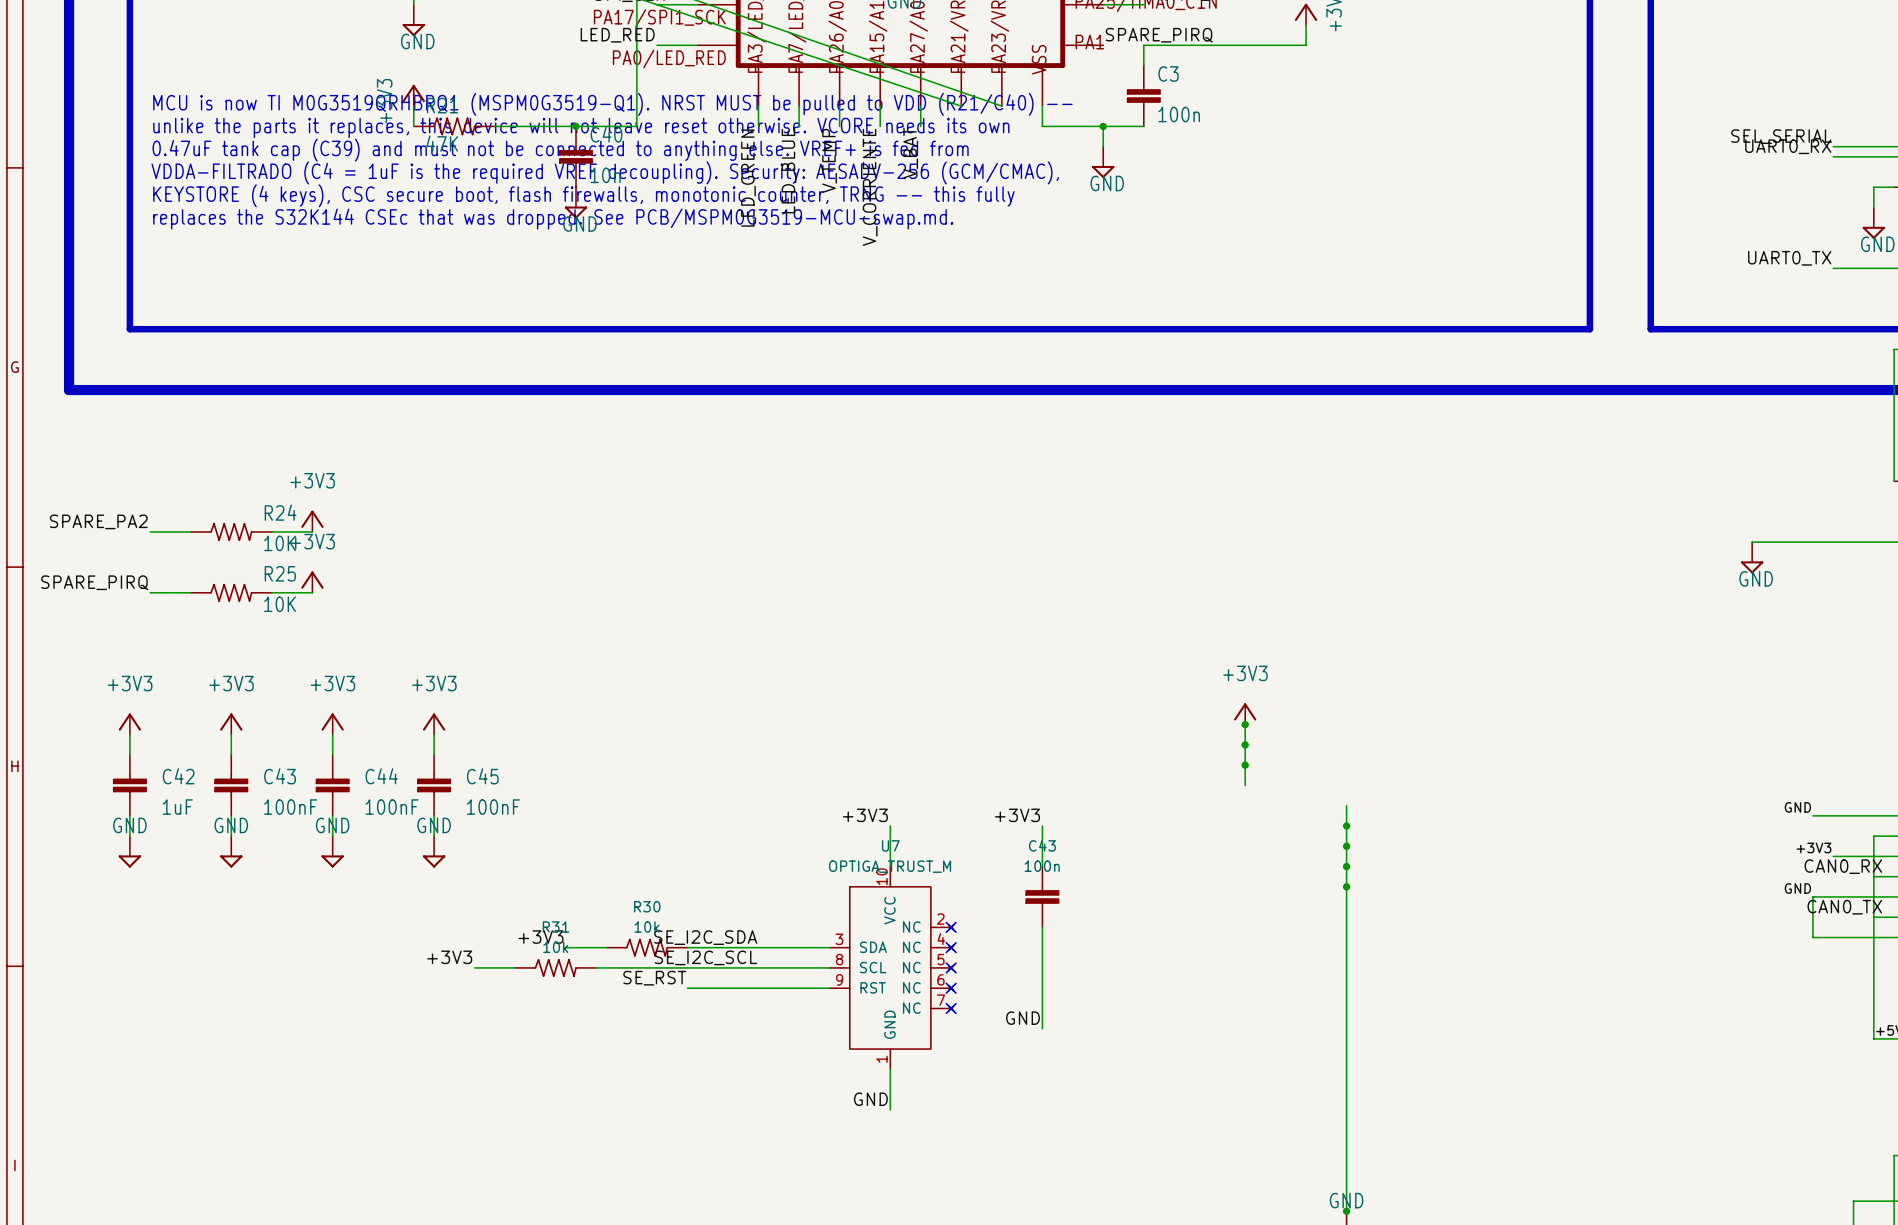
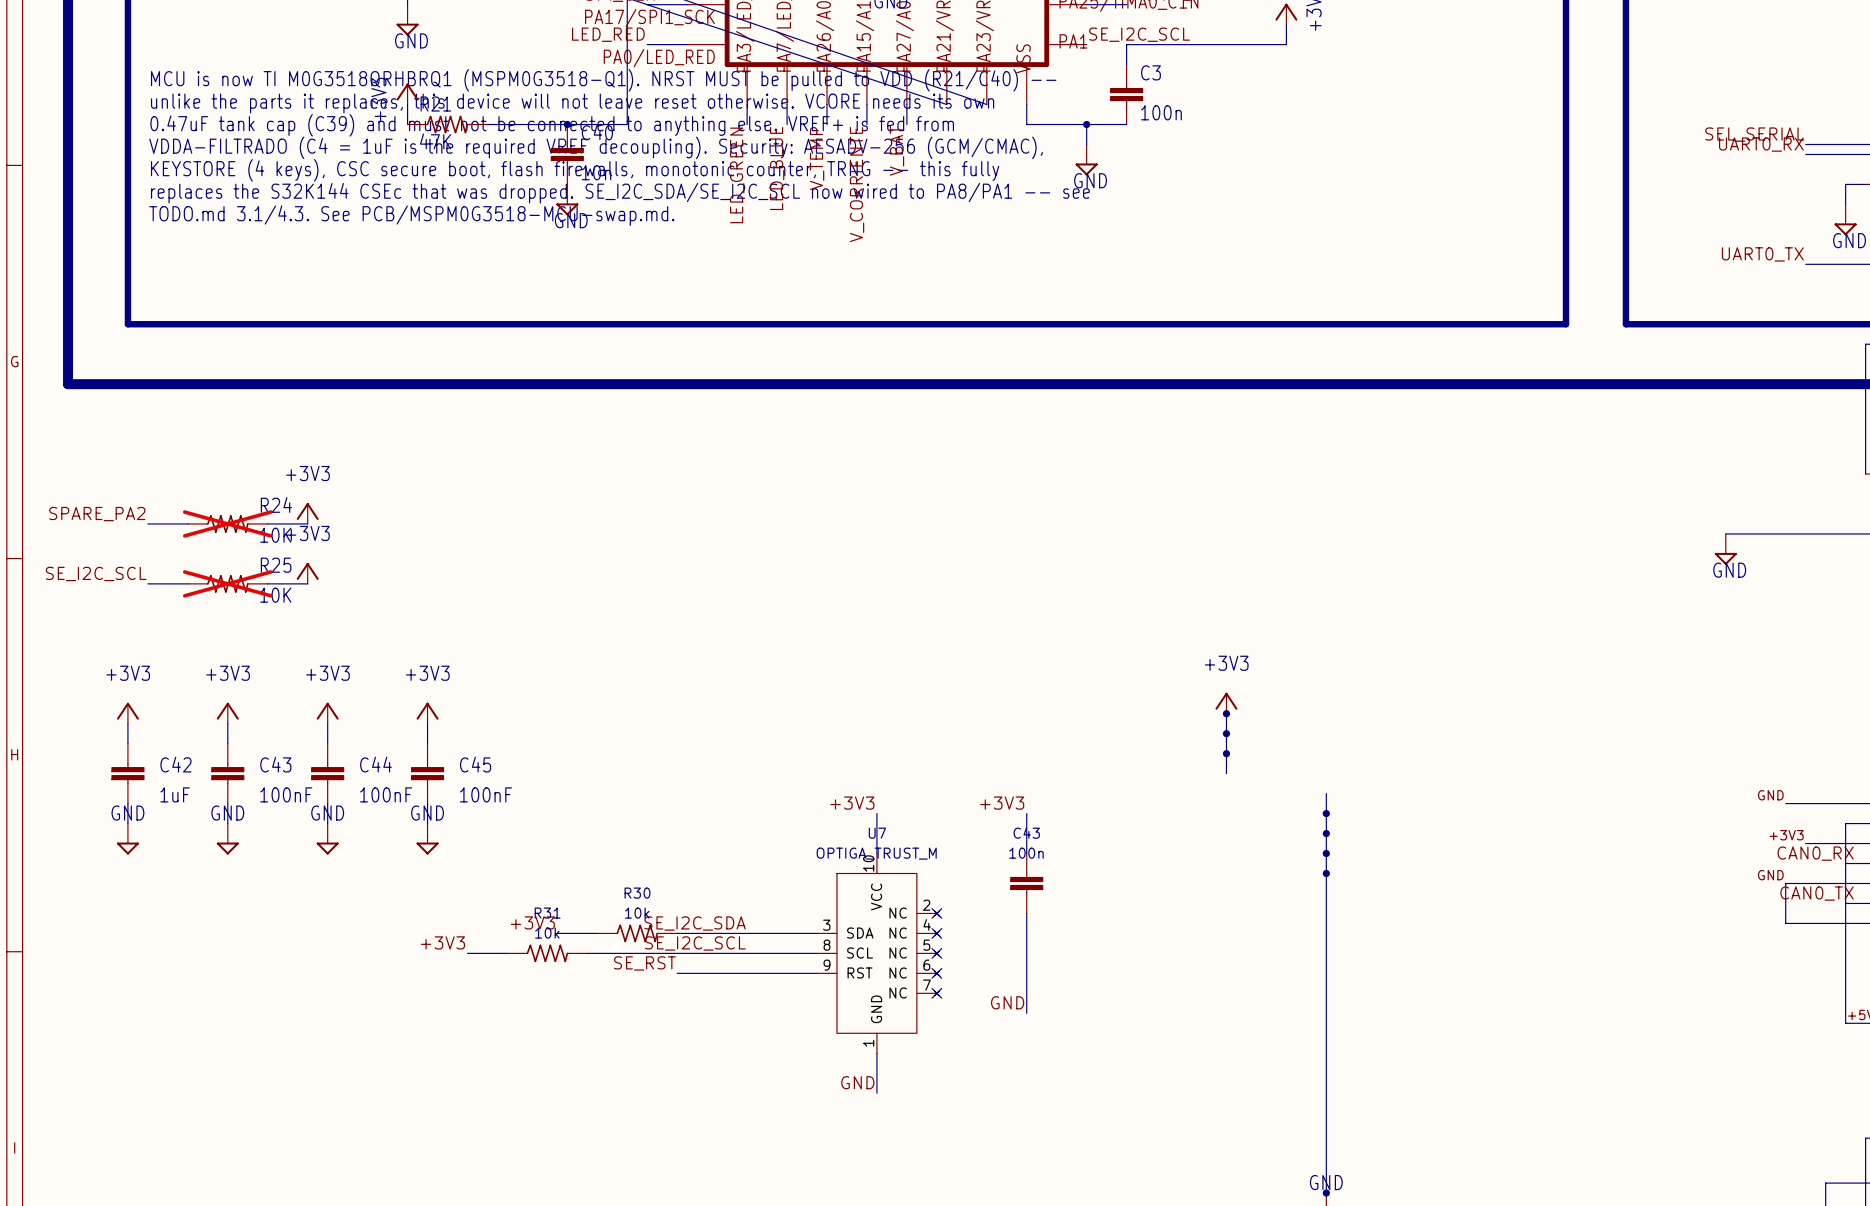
label: SPARE_PIRQ (1159, 35) -> SE_I2C_SCL (1139, 34)
text: none -> MCU is now TI M0G3518QRHBRQ1 (MSPM0G3518-Q1). NRST MUST be pulled to VDD (R21/C40) -- (603, 80)
text: MCU is now TI M0G3519QRHBRQ1 (MSPM0G3519-Q1). NRST MUST be pulled to VDD (R21/C40) -- (612, 104) -> unlike the parts it replaces, this device will not leave reset otherwise. VCORE needs its own (572, 103)
text: unlike the parts it replaces, this device will not leave reset otherwise. VCORE needs its own (581, 127) -> 0.47uF tank cap (C39) and must not be connected to anything else. VREF+ is fed from (552, 125)
text: 0.47uF tank cap (C39) and must not be connected to anything else. VREF+ is fed from (560, 150) -> VDDA-FILTRADO (C4 = 1uF is the required VREF decoupling). Security: AESADV-256 (GCM/CMAC), (596, 147)
text: VDDA-FILTRADO (C4 = 1uF is the required VREF decoupling). Security: AESADV-256 (GCM/CMAC), (605, 172) -> KEYSTORE (4 keys), CSC secure boot, flash firewalls, monotonic counter, TRNG -- this fully (575, 170)
text: KEYSTORE (4 keys), CSC secure boot, flash firewalls, monotonic counter, TRNG -- this fully (583, 195) -> replaces the S32K144 CSEc that was dropped. SE_I2C_SDA/SE_I2C_SCL now wired to PA8/PA1 -- see (620, 193)
text: replaces the S32K144 CSEc that was dropped. See PCB/MSPM0G3519-MCU-swap.md. (553, 218) -> TODO.md 3.1/4.3. See PCB/MSPM0G3518-MCU-swap.md. (411, 215)
R24 do-not-place cross: none -> (227, 523)
label: SPARE_PIRQ (94, 582) -> SE_I2C_SCL (96, 573)
R25 do-not-place cross: none -> (227, 583)

